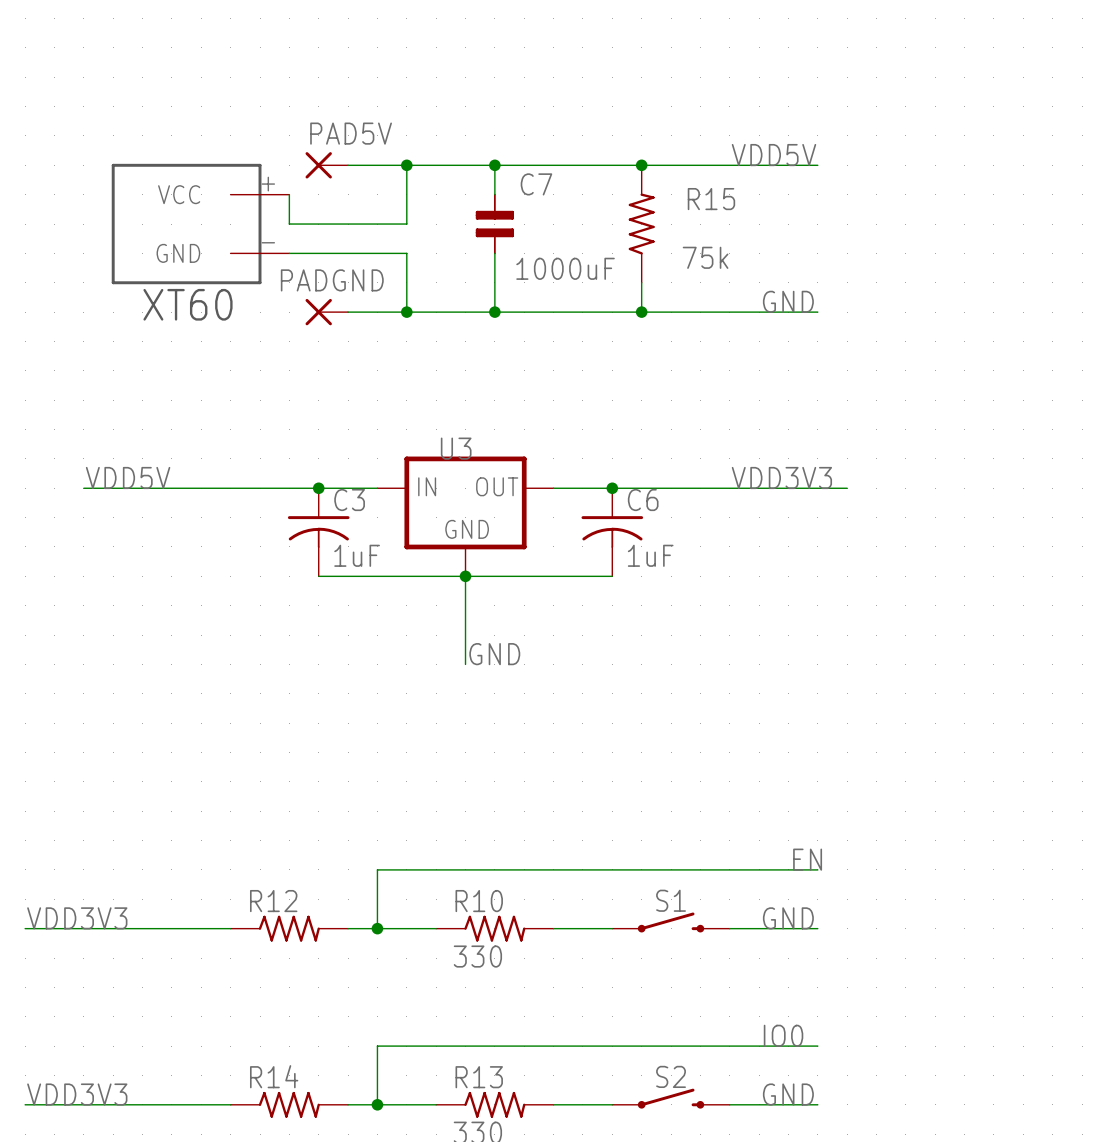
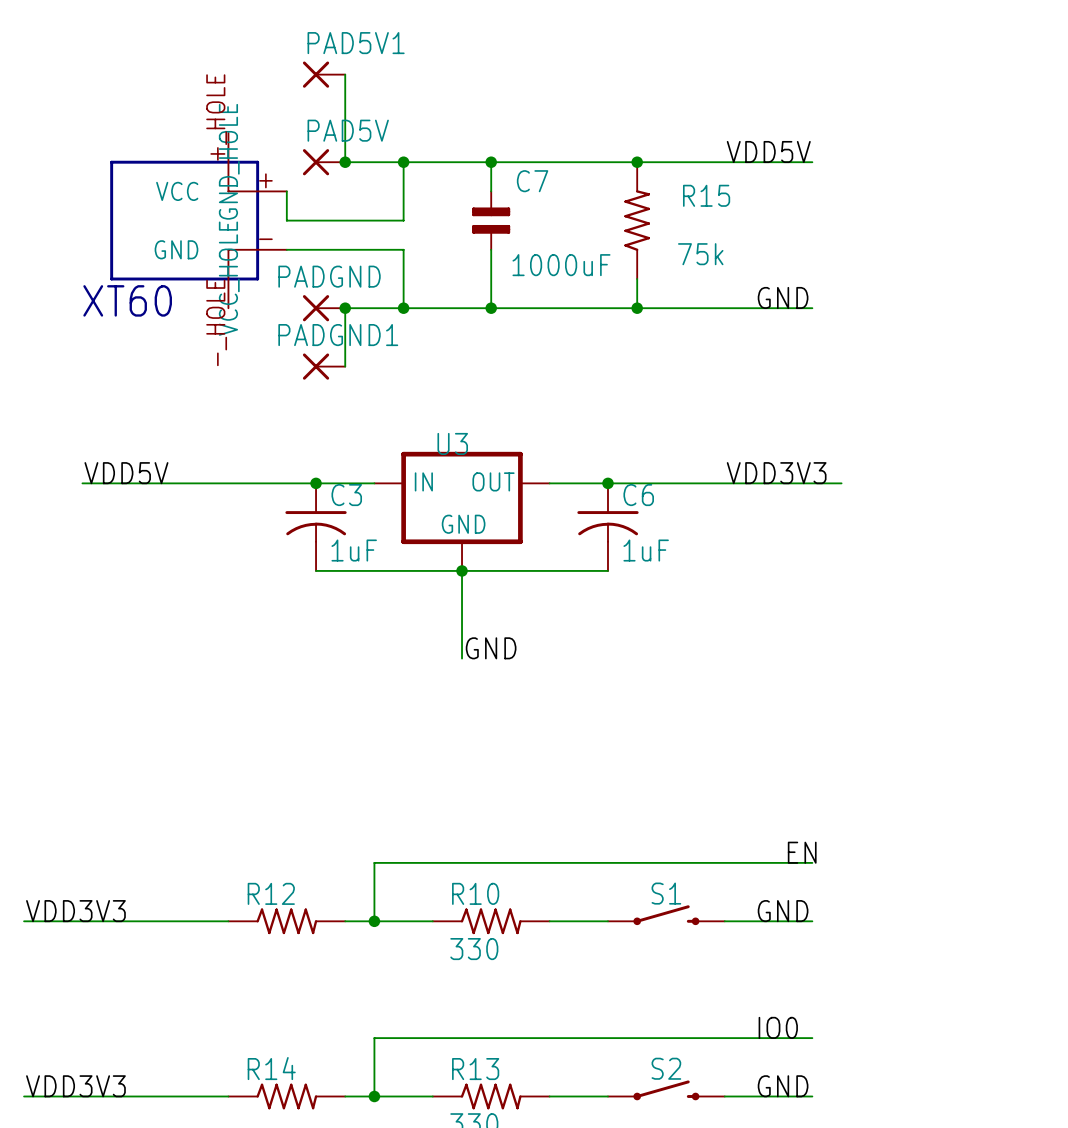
PAD5V1: none -> (324, 74)
wire: none -> (345, 74) (345, 162)
part symbol: [111, 163, 290, 285] -> [110, 133, 287, 309]
junction: none -> (345, 162)
wire: none -> (345, 308) (345, 366)
junction: none -> (345, 308)
PADGND1: none -> (324, 366)

